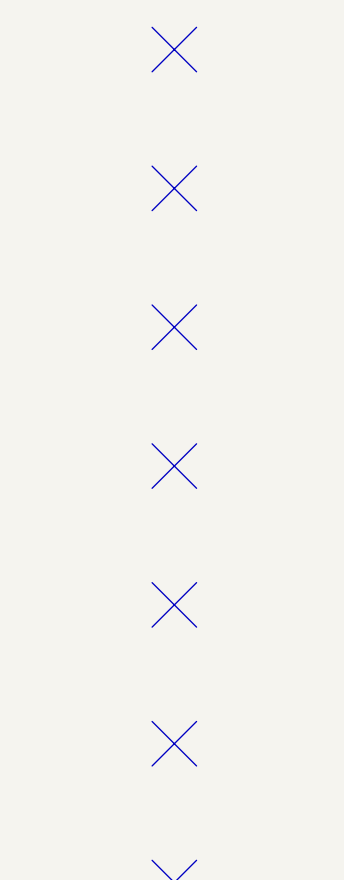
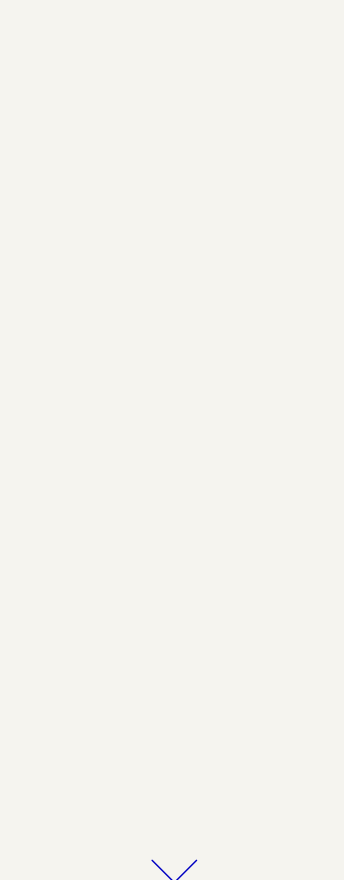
no-connect mark: (174, 49) -> none
no-connect mark: (174, 188) -> none
no-connect mark: (174, 327) -> none
no-connect mark: (174, 466) -> none
no-connect mark: (174, 604) -> none
no-connect mark: (174, 743) -> none

